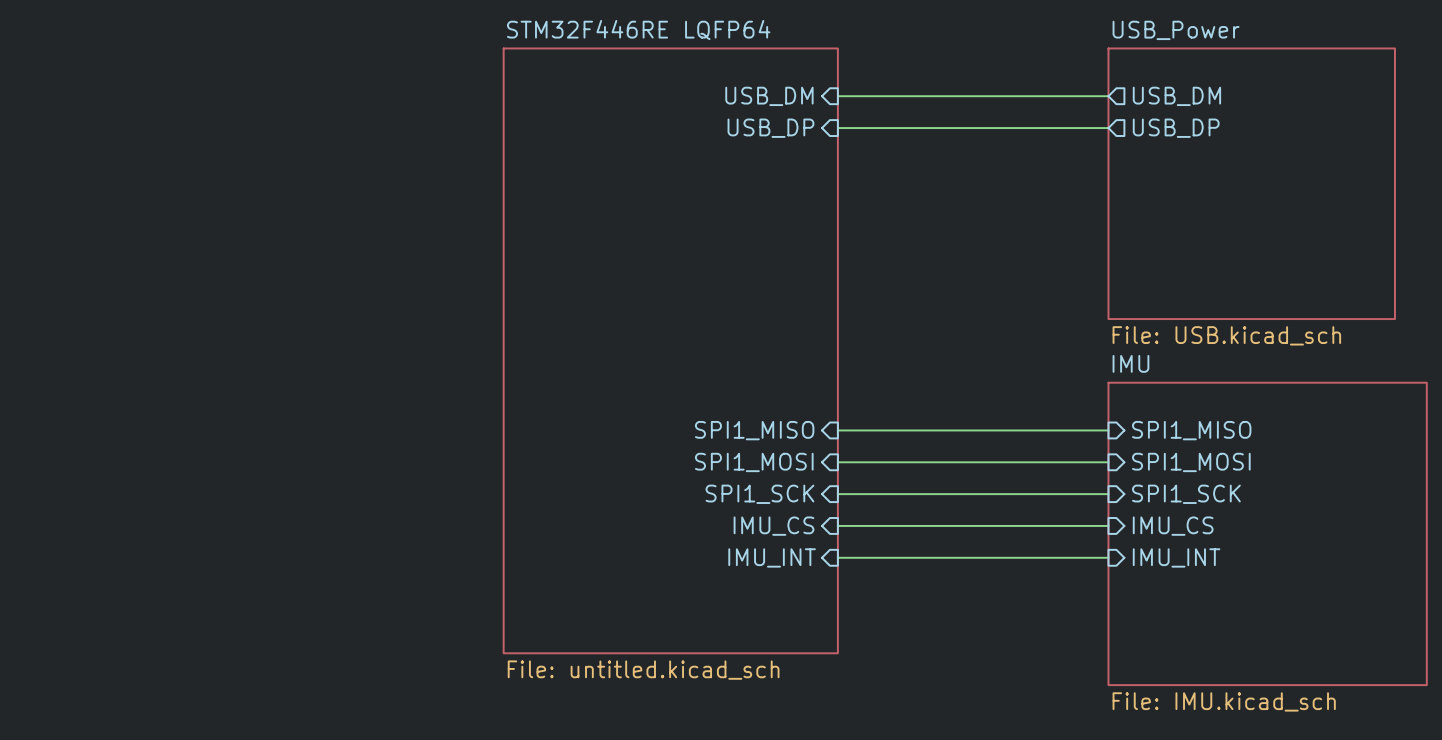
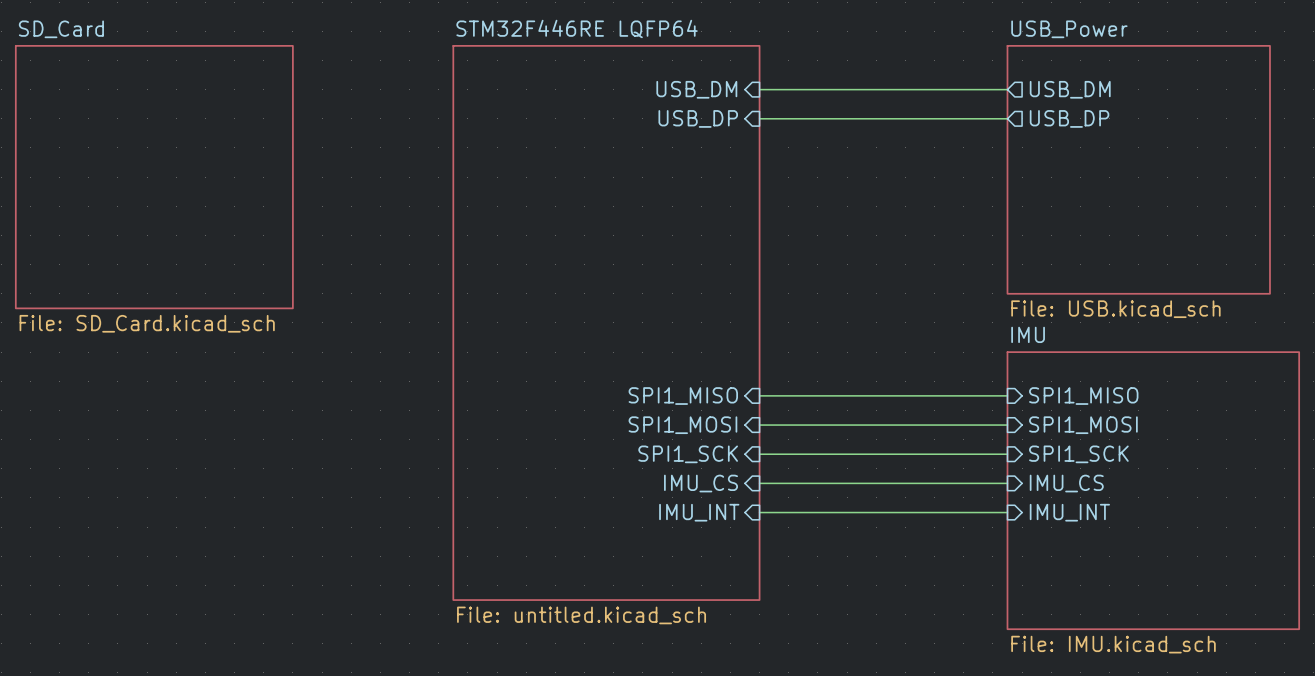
sheet SD_Card: none -> File: SD_Card.kicad_sch (154, 177)

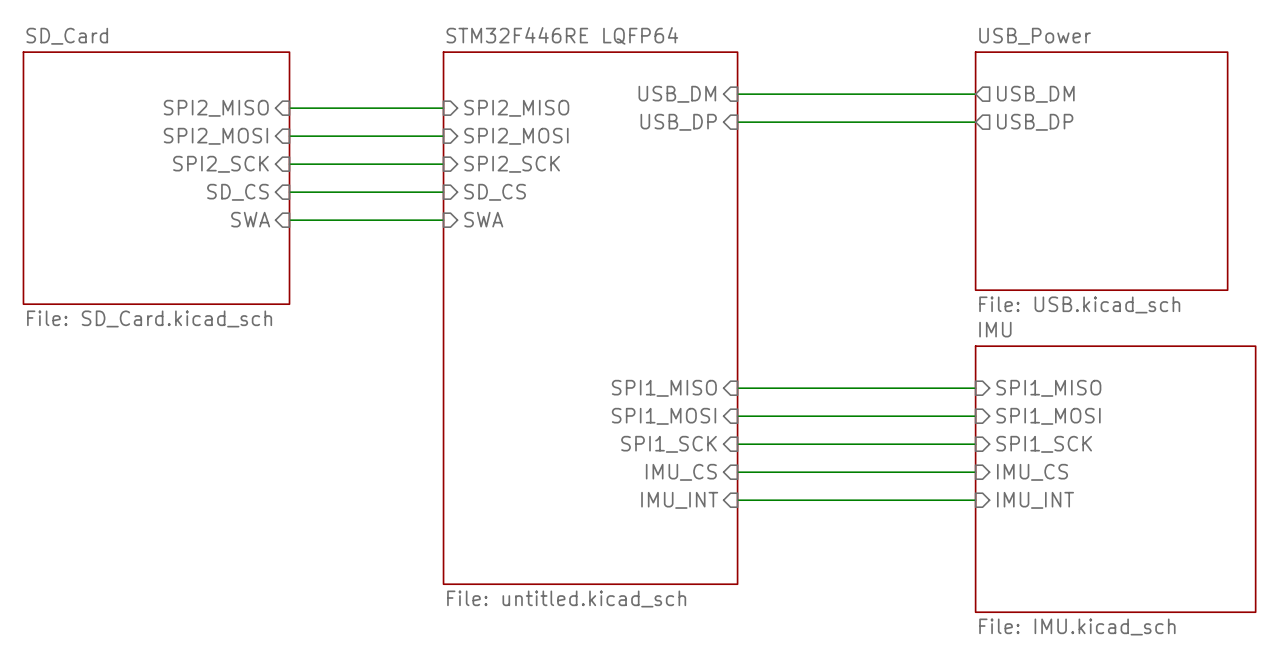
sheet pin: none -> SPI2_MISO (216, 108)
wire: none -> (289, 108) (443, 108)
sheet pin: none -> SPI2_MISO (516, 108)
sheet pin: none -> SPI2_MOSI (215, 136)
wire: none -> (289, 136) (443, 136)
sheet pin: none -> SPI2_MOSI (516, 136)
sheet pin: none -> SPI2_SCK (220, 164)
wire: none -> (289, 164) (443, 164)
sheet pin: none -> SPI2_SCK (512, 164)
sheet pin: none -> SD_CS (237, 192)
wire: none -> (289, 192) (443, 192)
sheet pin: none -> SD_CS (495, 192)
sheet pin: none -> SWA (250, 219)
wire: none -> (289, 220) (443, 220)
sheet pin: none -> SWA (483, 219)

